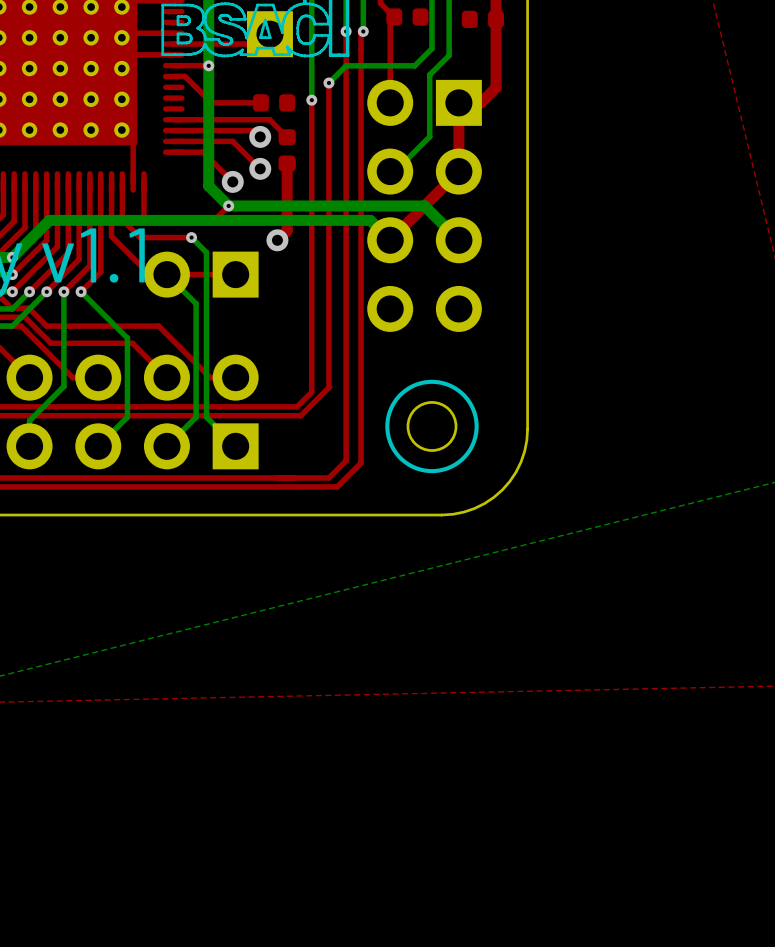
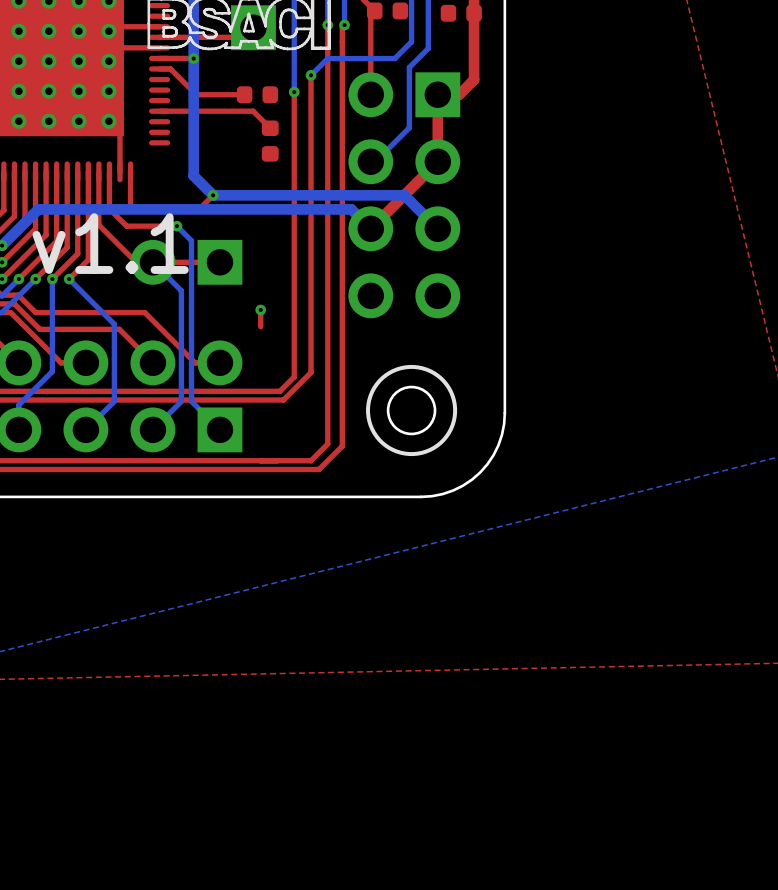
top track: (173, 130) (253, 130) (260, 136) -> none
via: (260, 136) -> none
top track: (173, 141) (232, 141) (260, 168) -> none
top track: (173, 152) (203, 152) (232, 181) -> none
top track: (287, 163) (287, 230) (277, 240) -> none
via: (260, 168) -> none
via: (232, 181) -> none
via: (277, 240) -> none
top track: none -> (260, 309) (260, 326)
via: none -> (260, 309)

